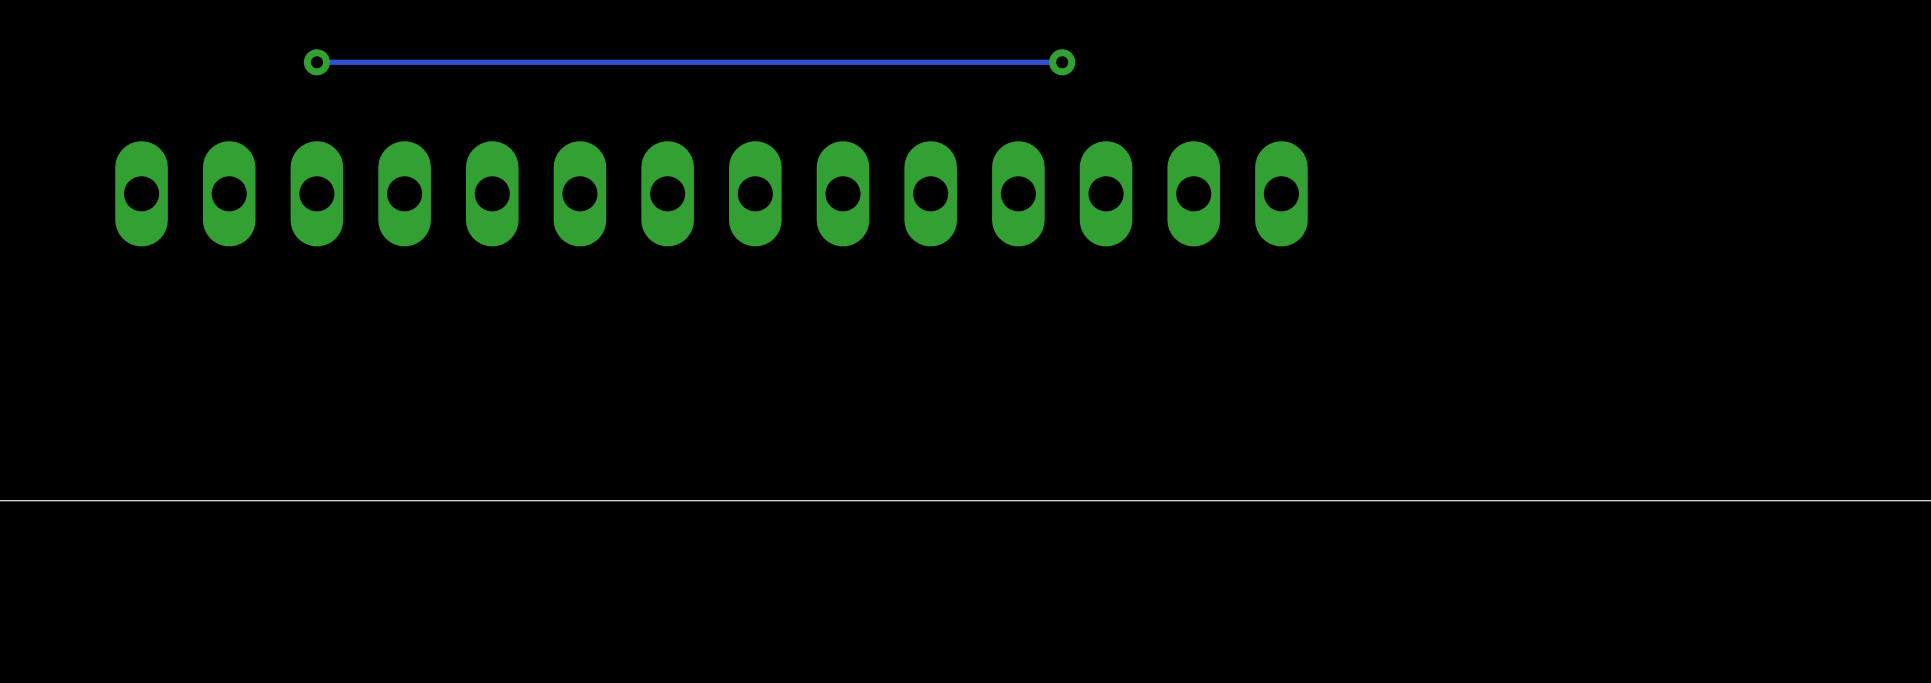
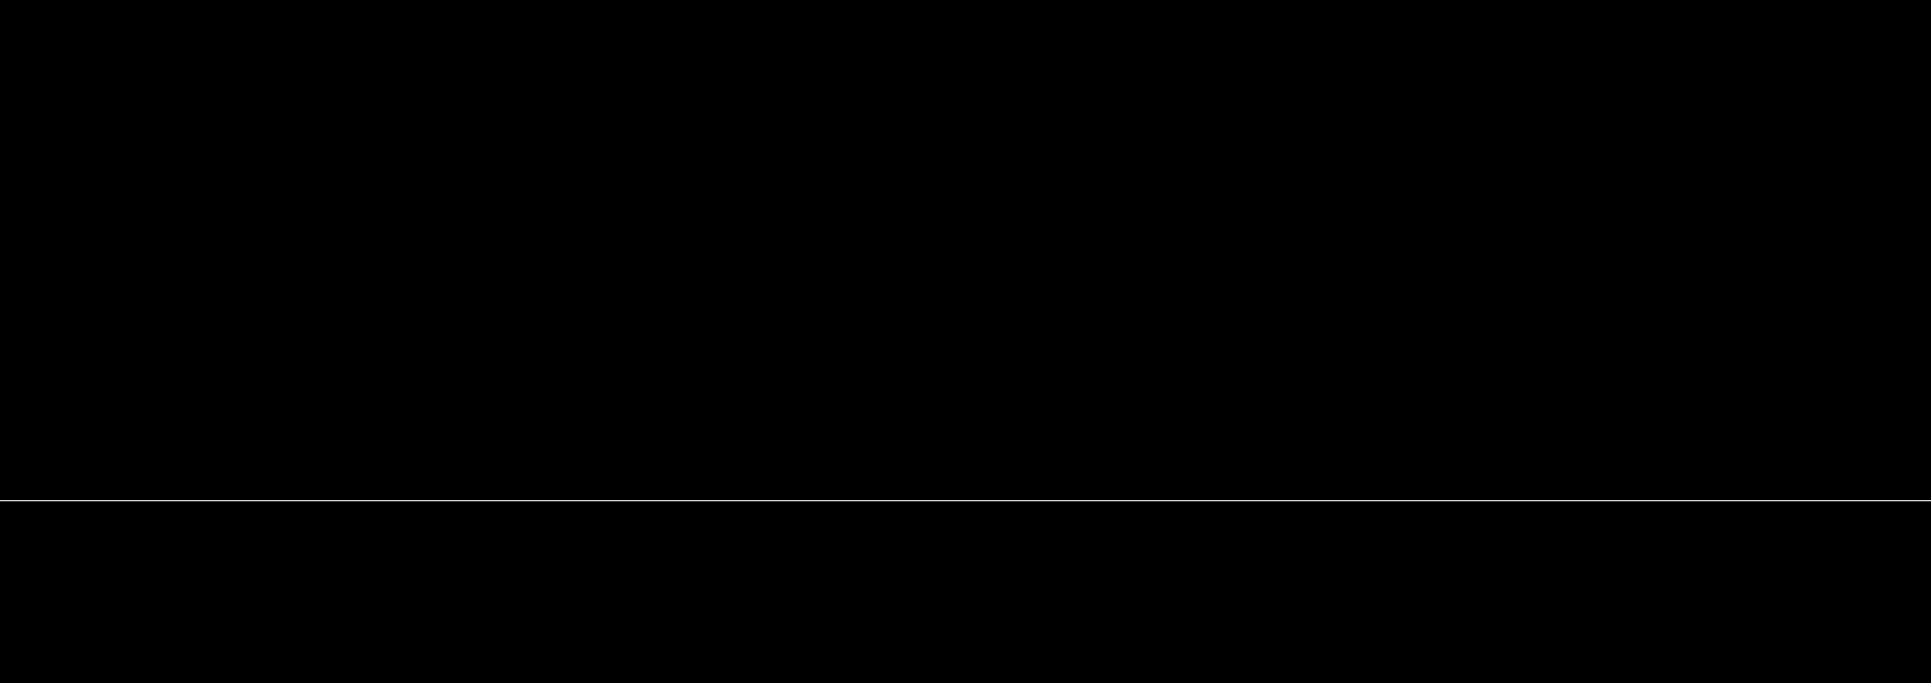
via: (316, 62) -> none
track: (1062, 62) (316, 62) -> none
via: (1062, 62) -> none
part: (711, 193) -> none

